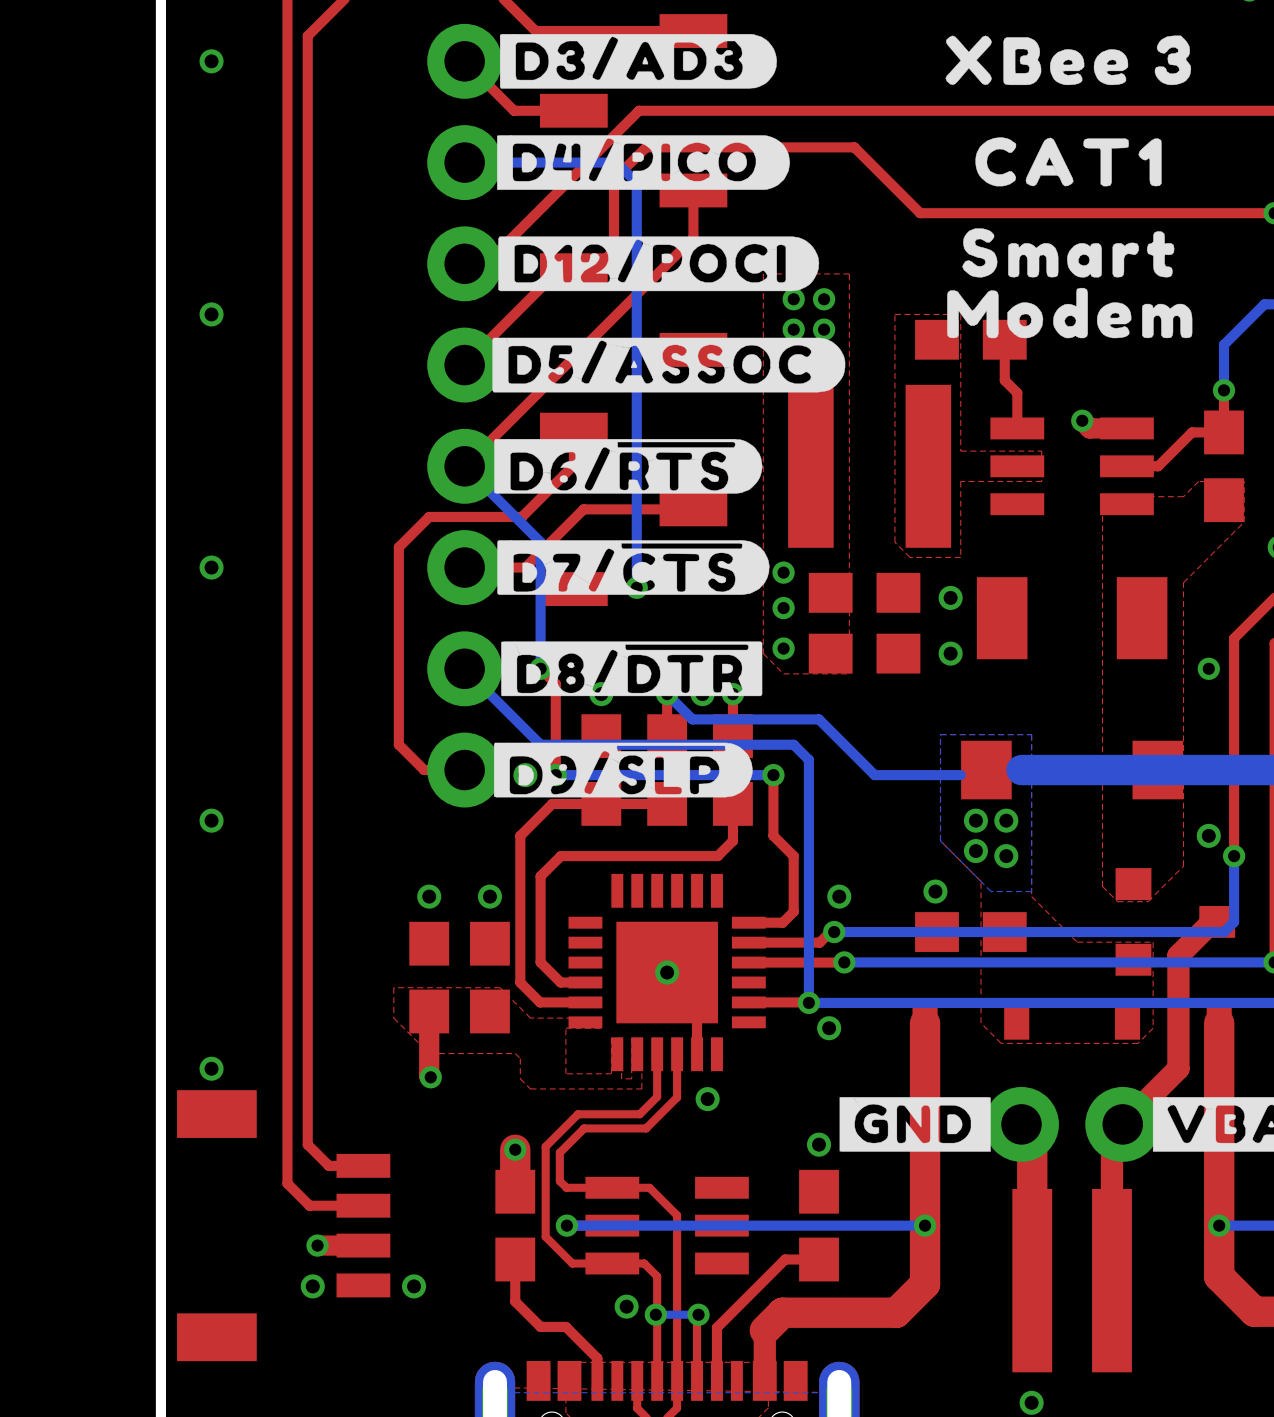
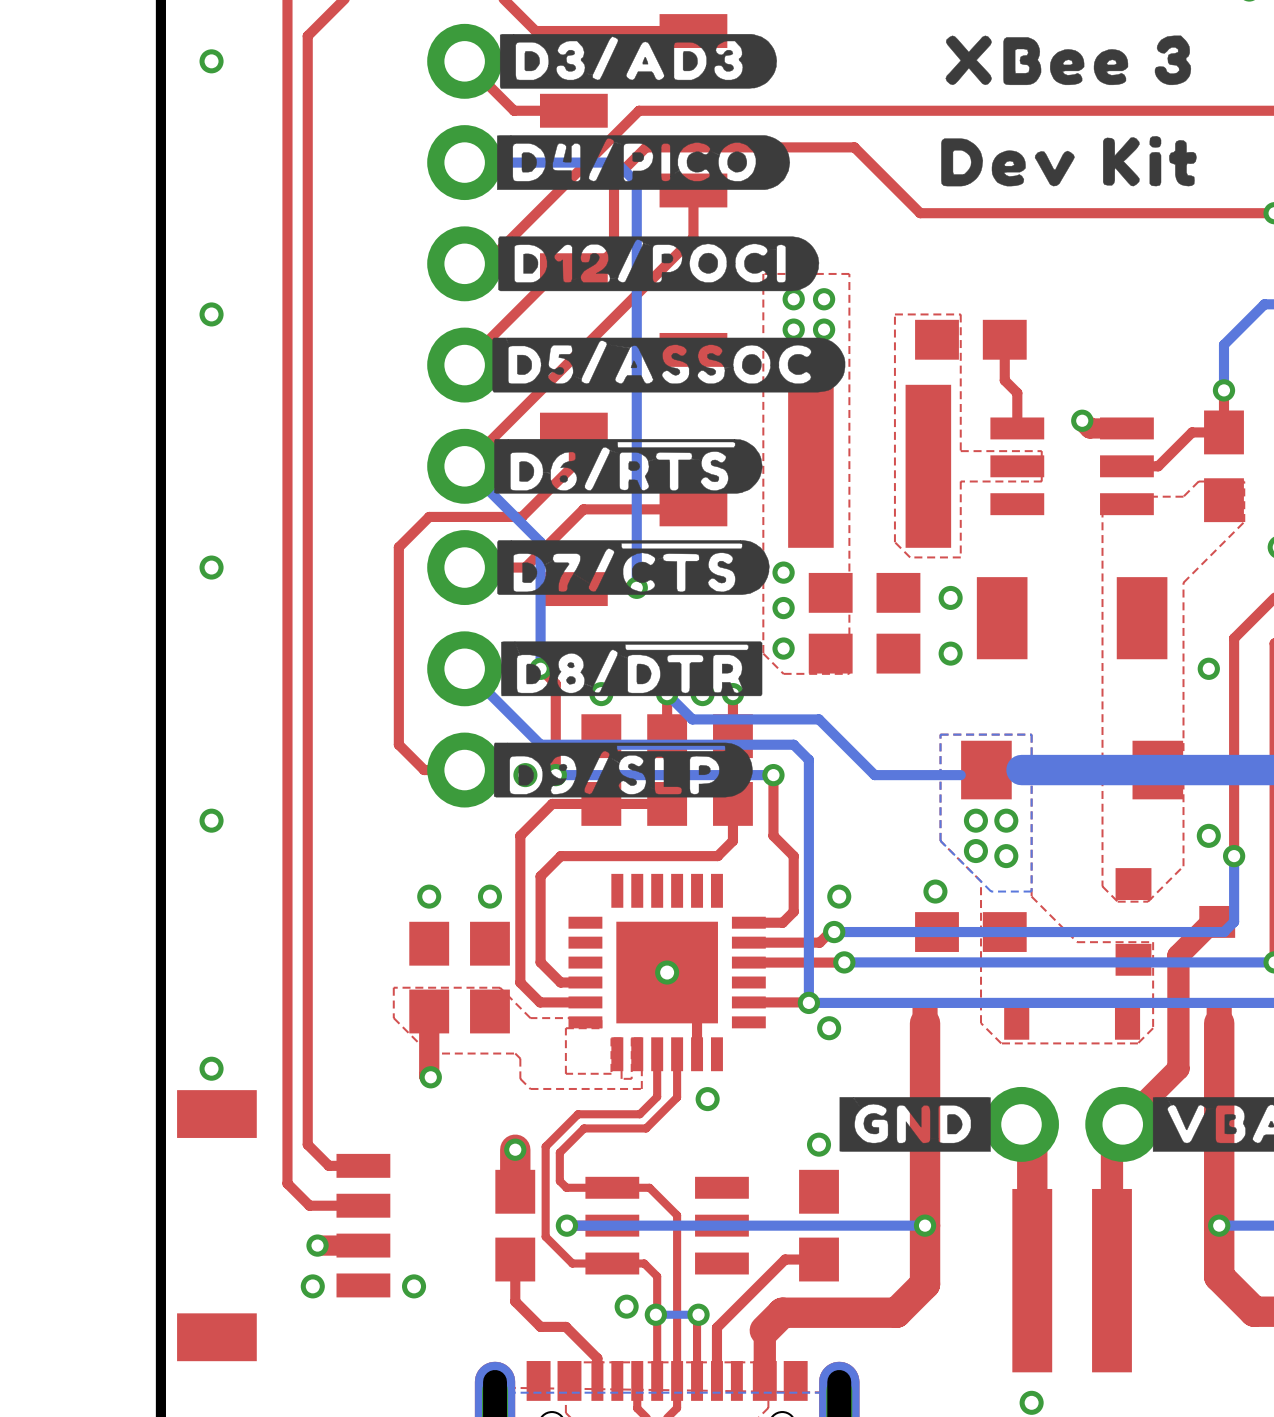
drawing shape: [975, 137, 1162, 187] -> [941, 136, 1197, 187]
drawing: [947, 228, 1193, 339] -> none

